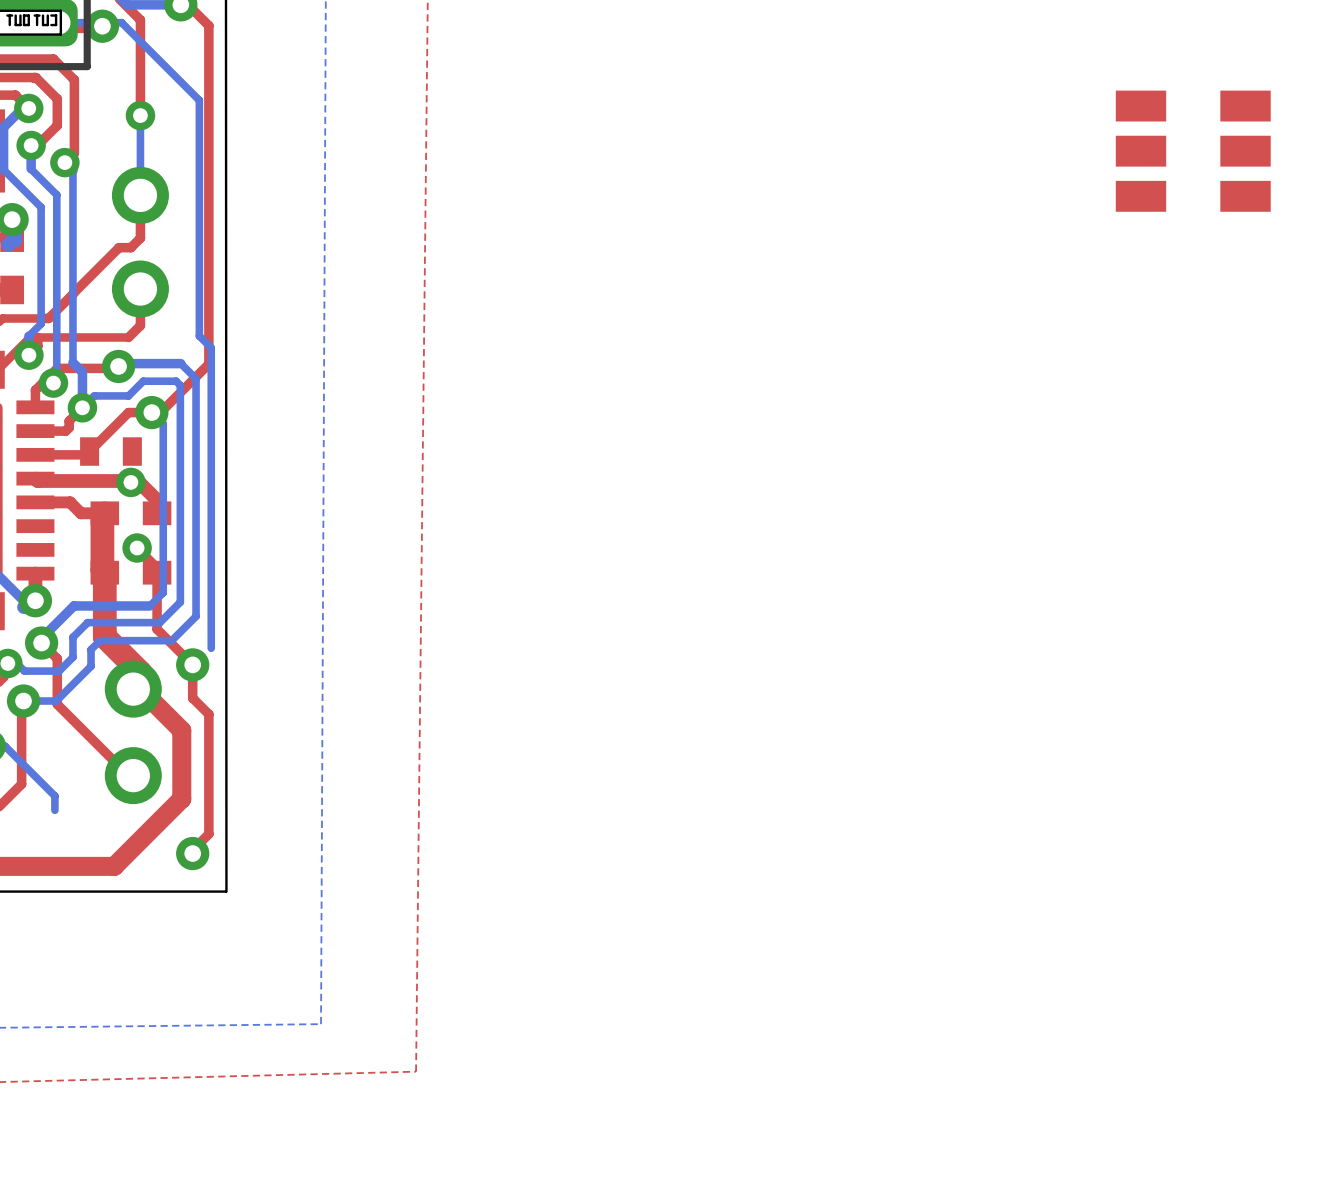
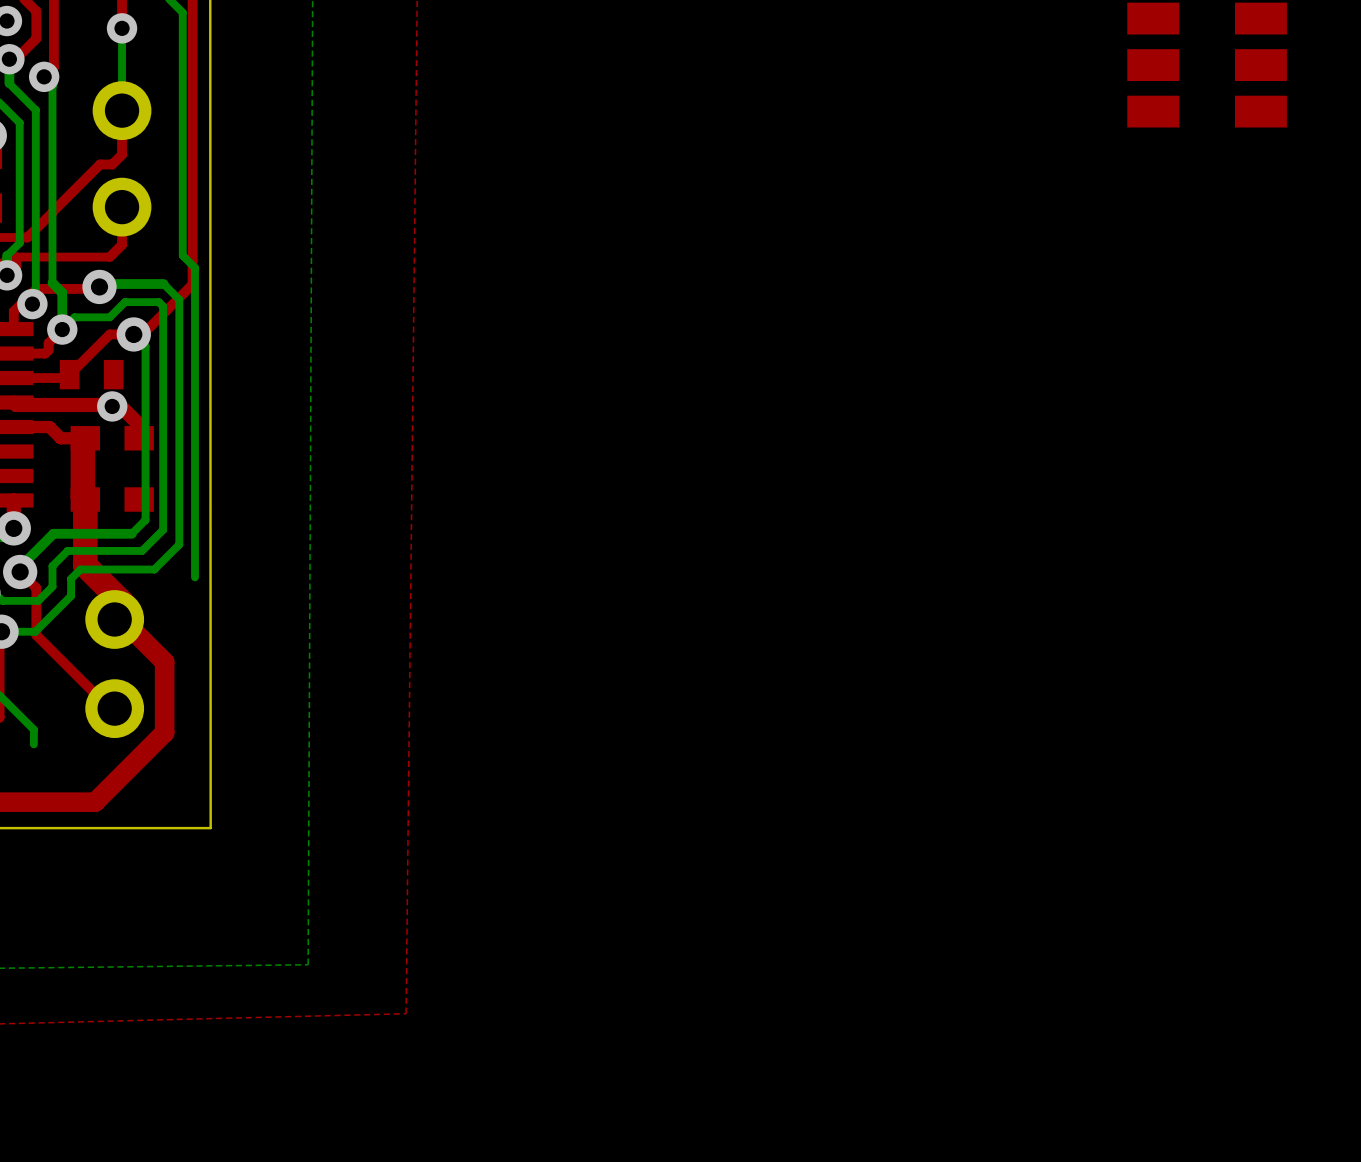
top track: (137, 548) (157, 567) (157, 629) (192, 664) (192, 698) (208, 714) (208, 834) (189, 853) -> none
via: (137, 548) -> none
via: (192, 664) -> none
via: (192, 853) -> none

